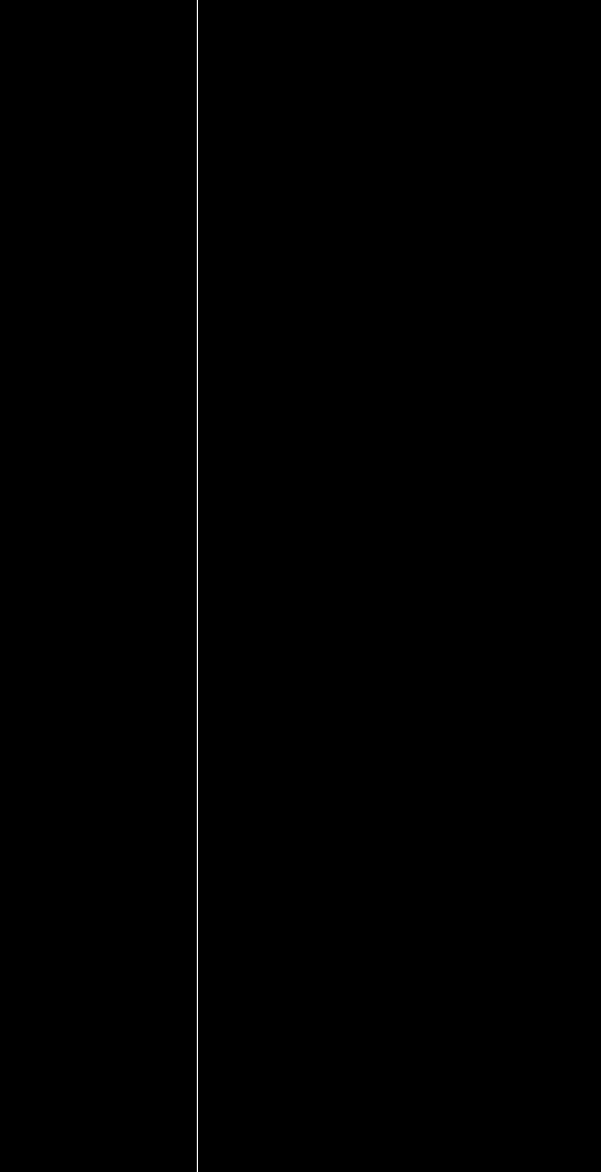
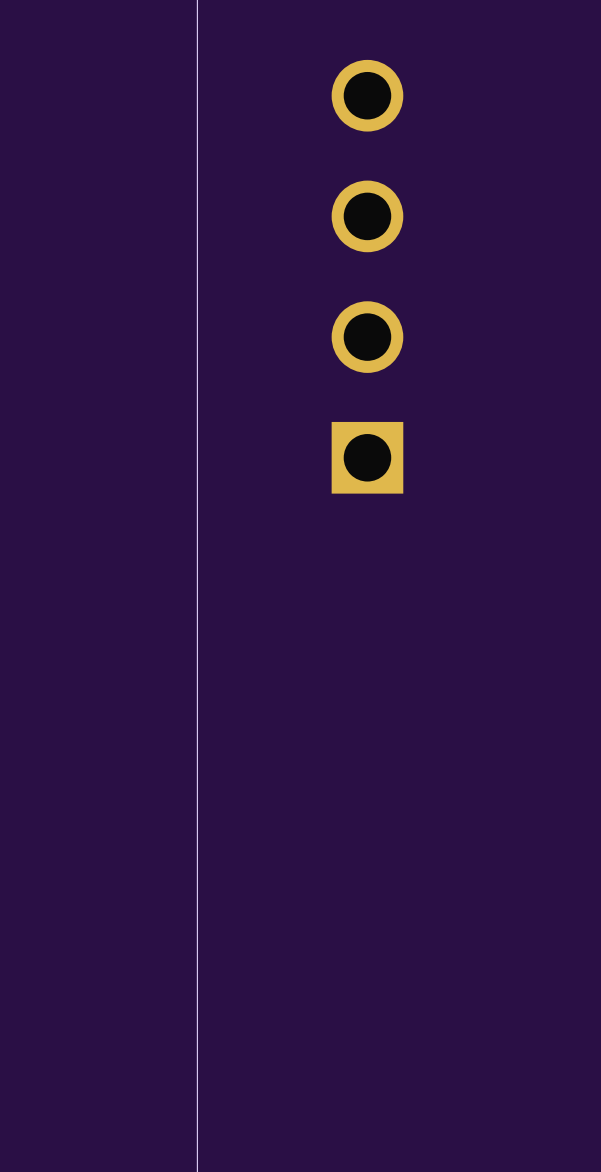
part: none -> (367, 276)

